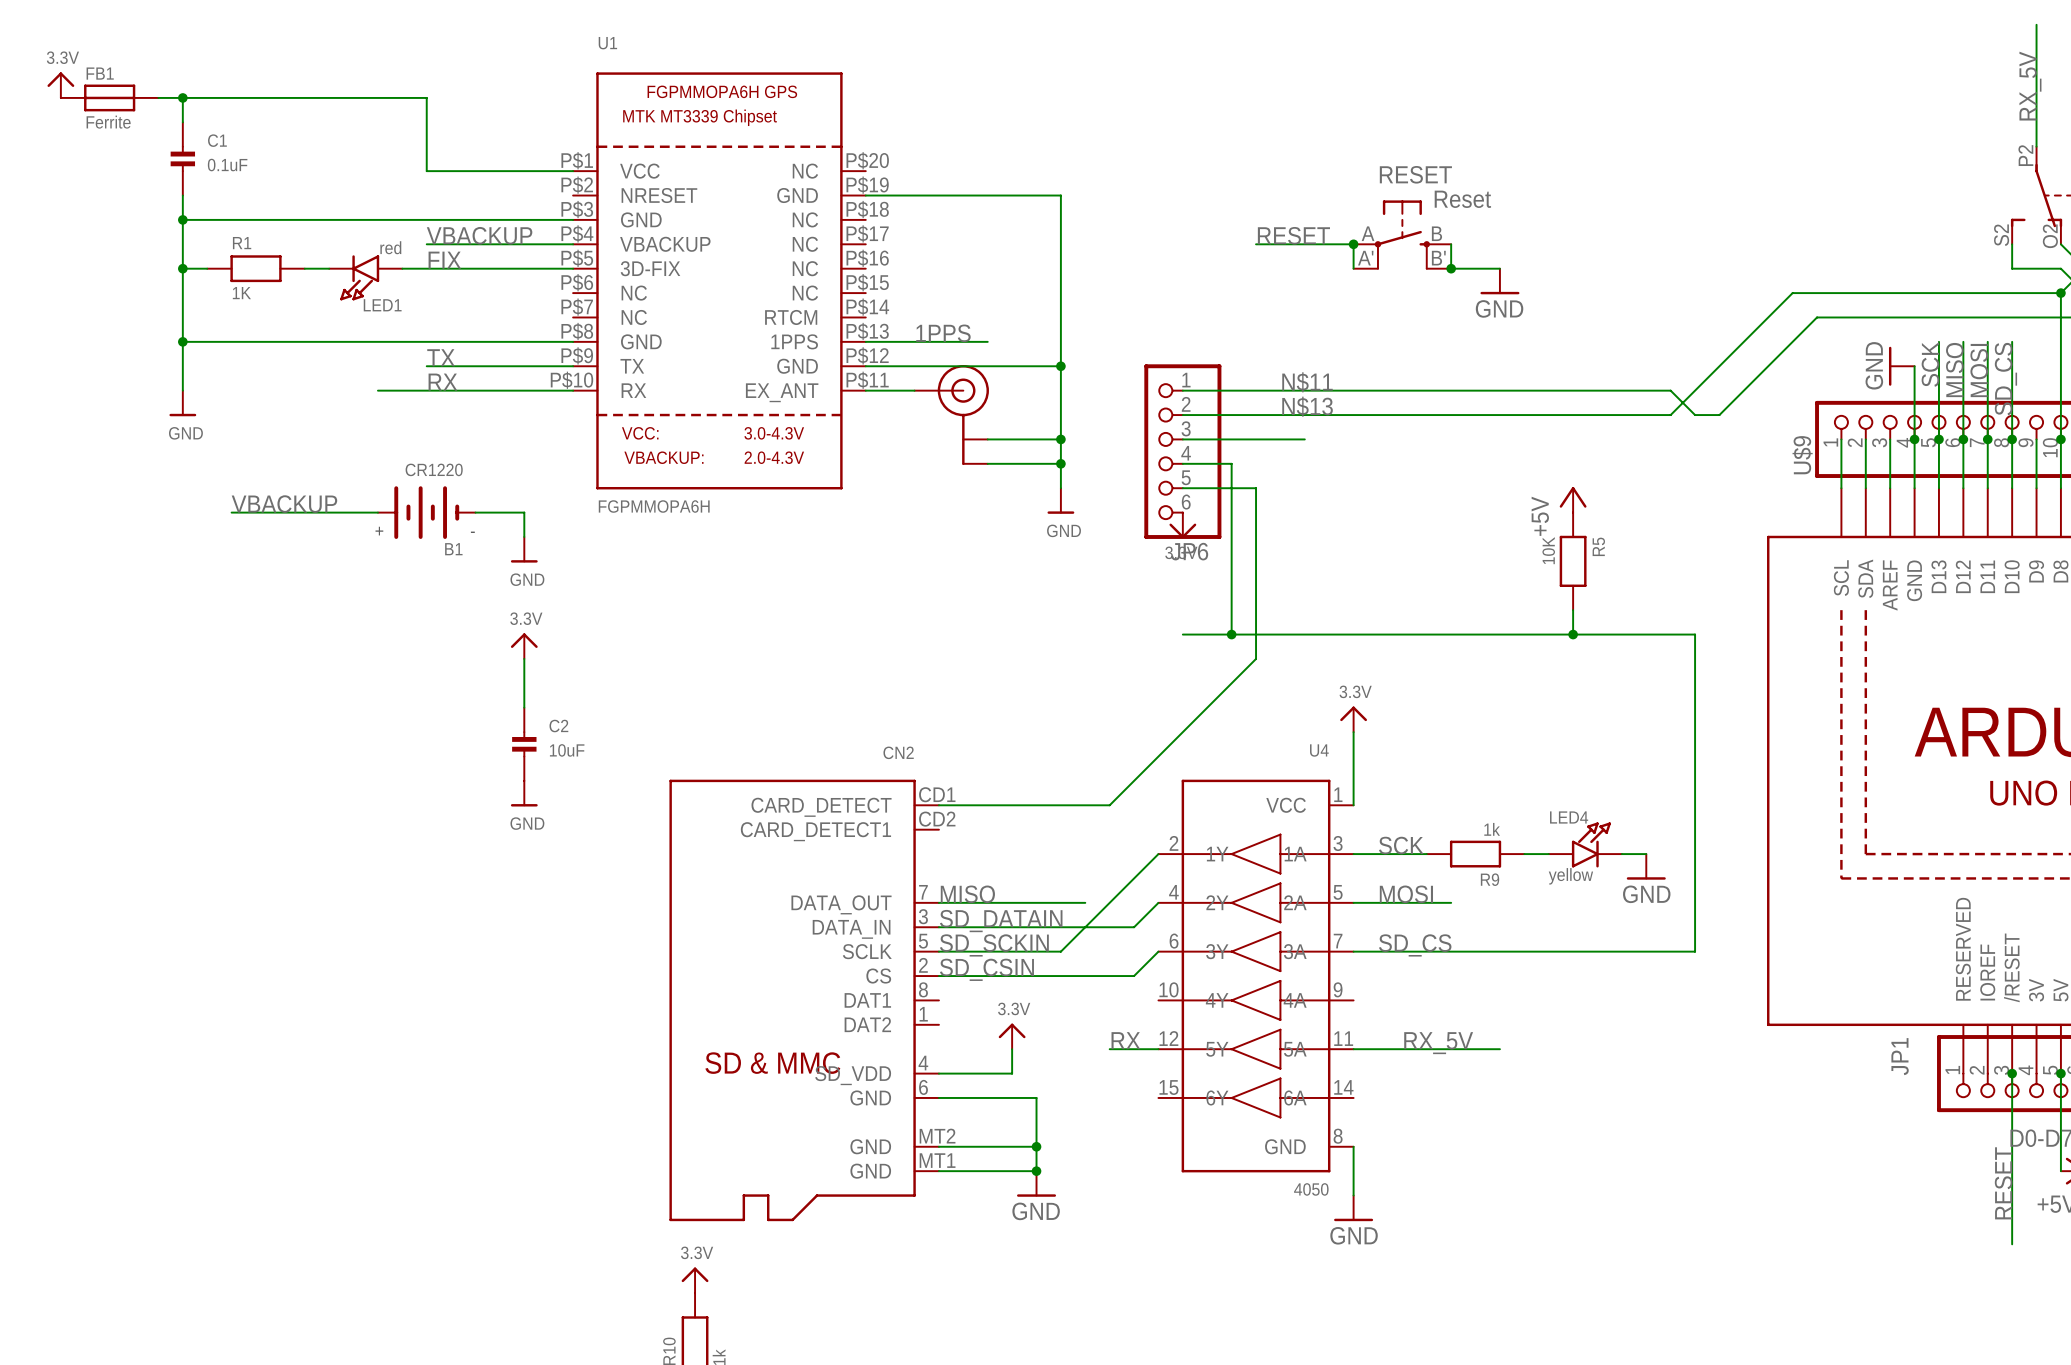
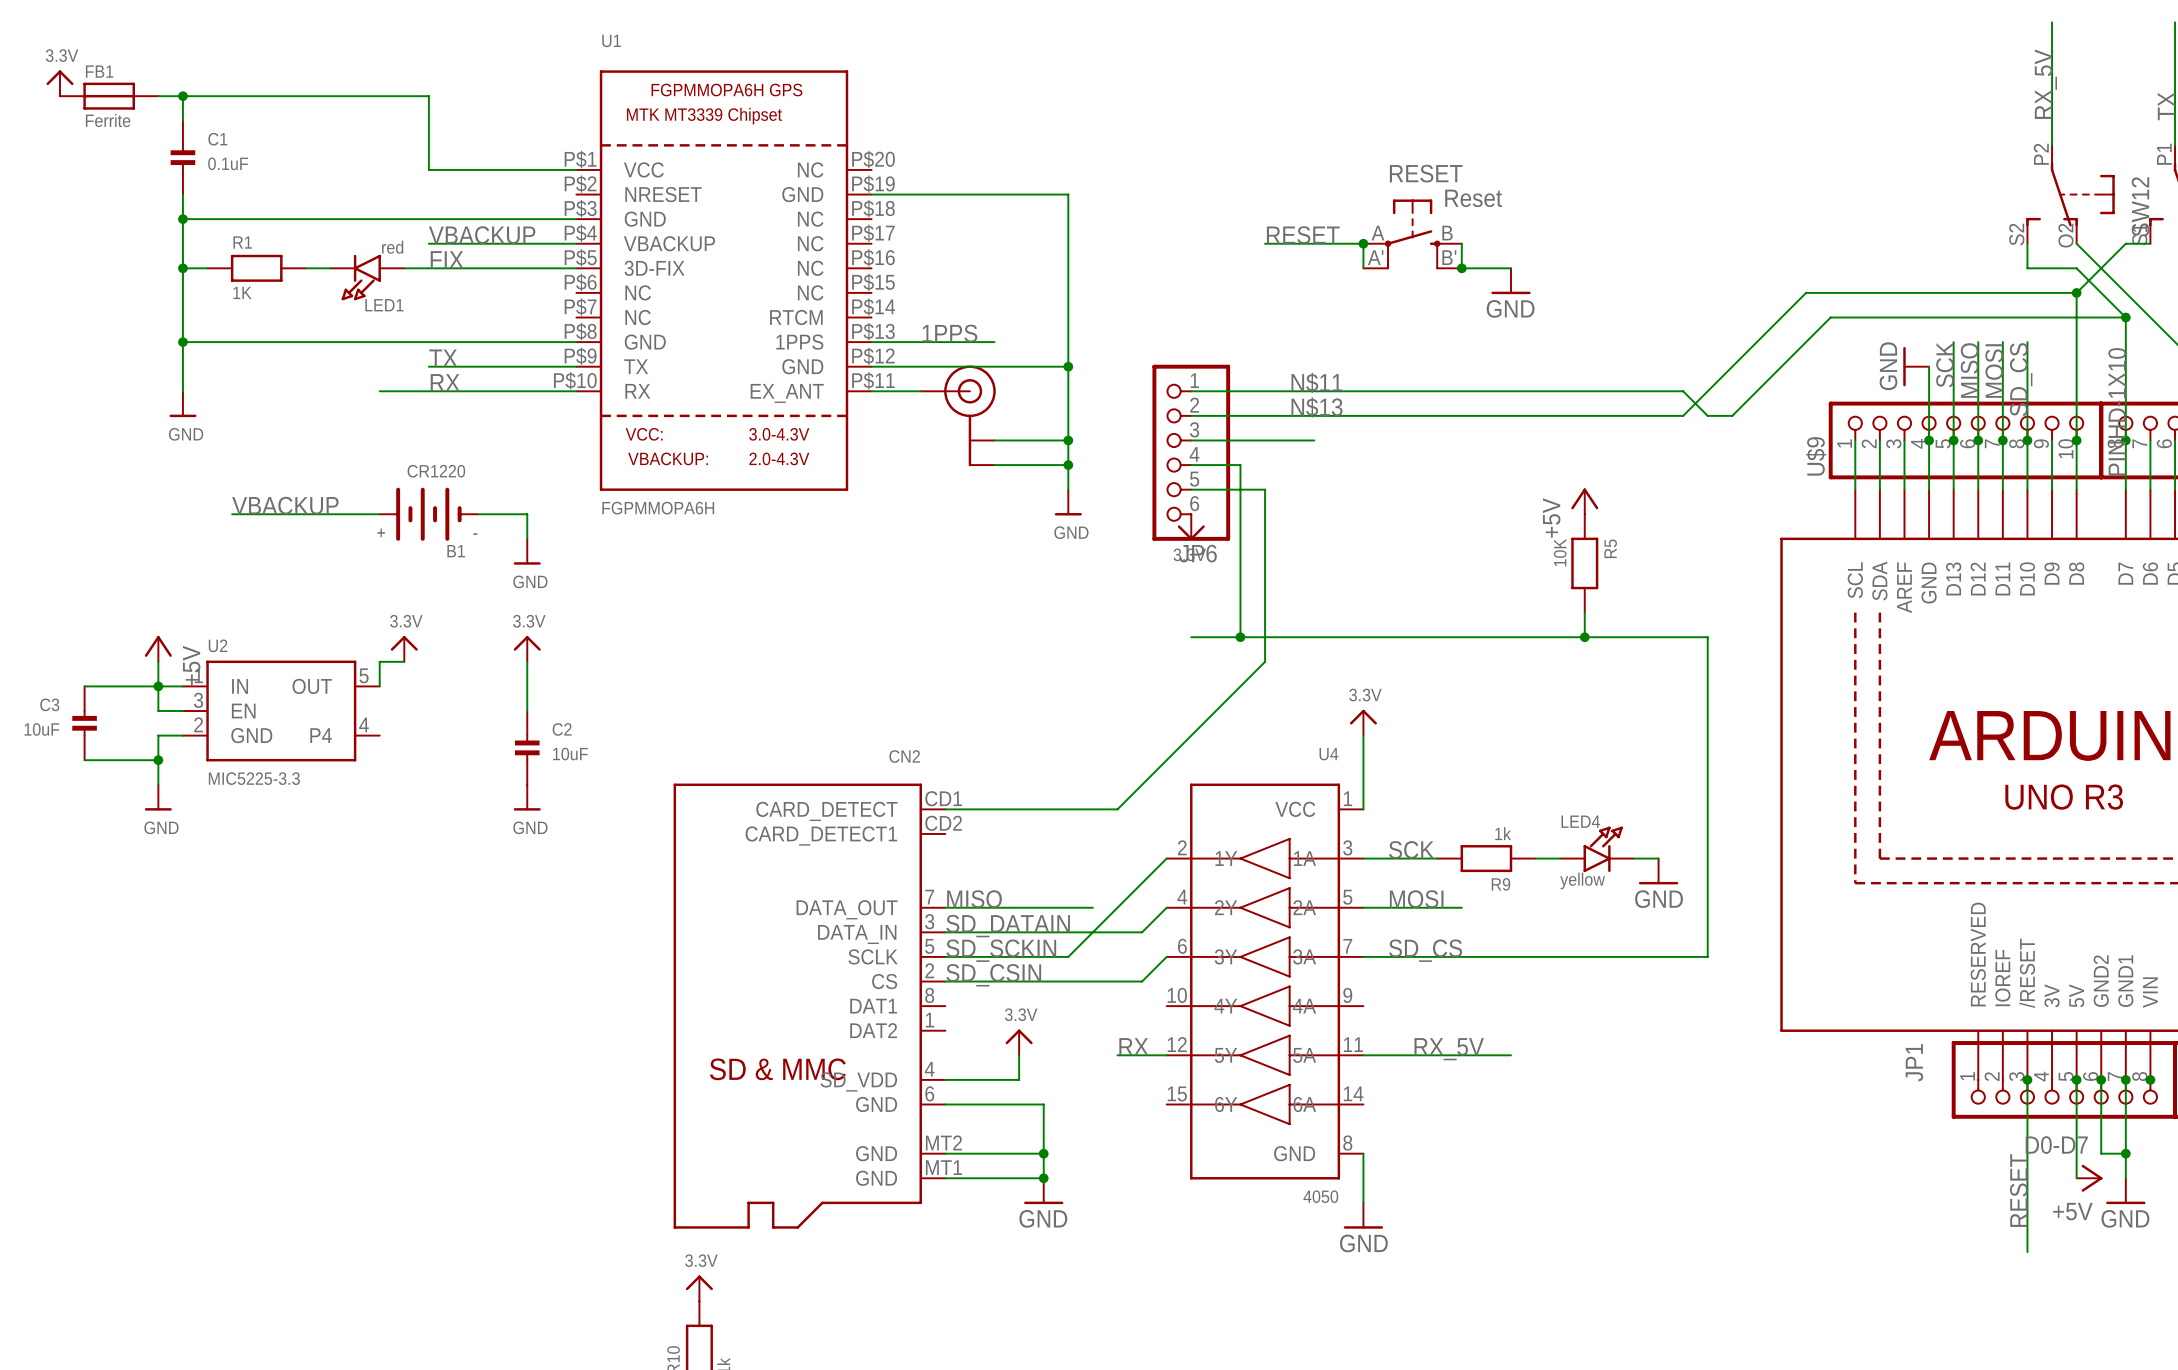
power symbol: none -> +5V (158, 648)
power symbol: none -> 3.3V (404, 648)
wire: none -> (158, 661) (158, 711) (182, 711)
wire: none -> (404, 661) (379, 661) (379, 686)
wire: none -> (84, 686) (182, 686)
junction: none -> (158, 686)
U2: none -> MIC5225-3.3 (281, 711)
C3: none -> 10uF (84, 723)
wire: none -> (182, 735) (158, 735) (158, 784)
wire: none -> (84, 760) (158, 760)
junction: none -> (158, 760)
power symbol: none -> GND (158, 797)

